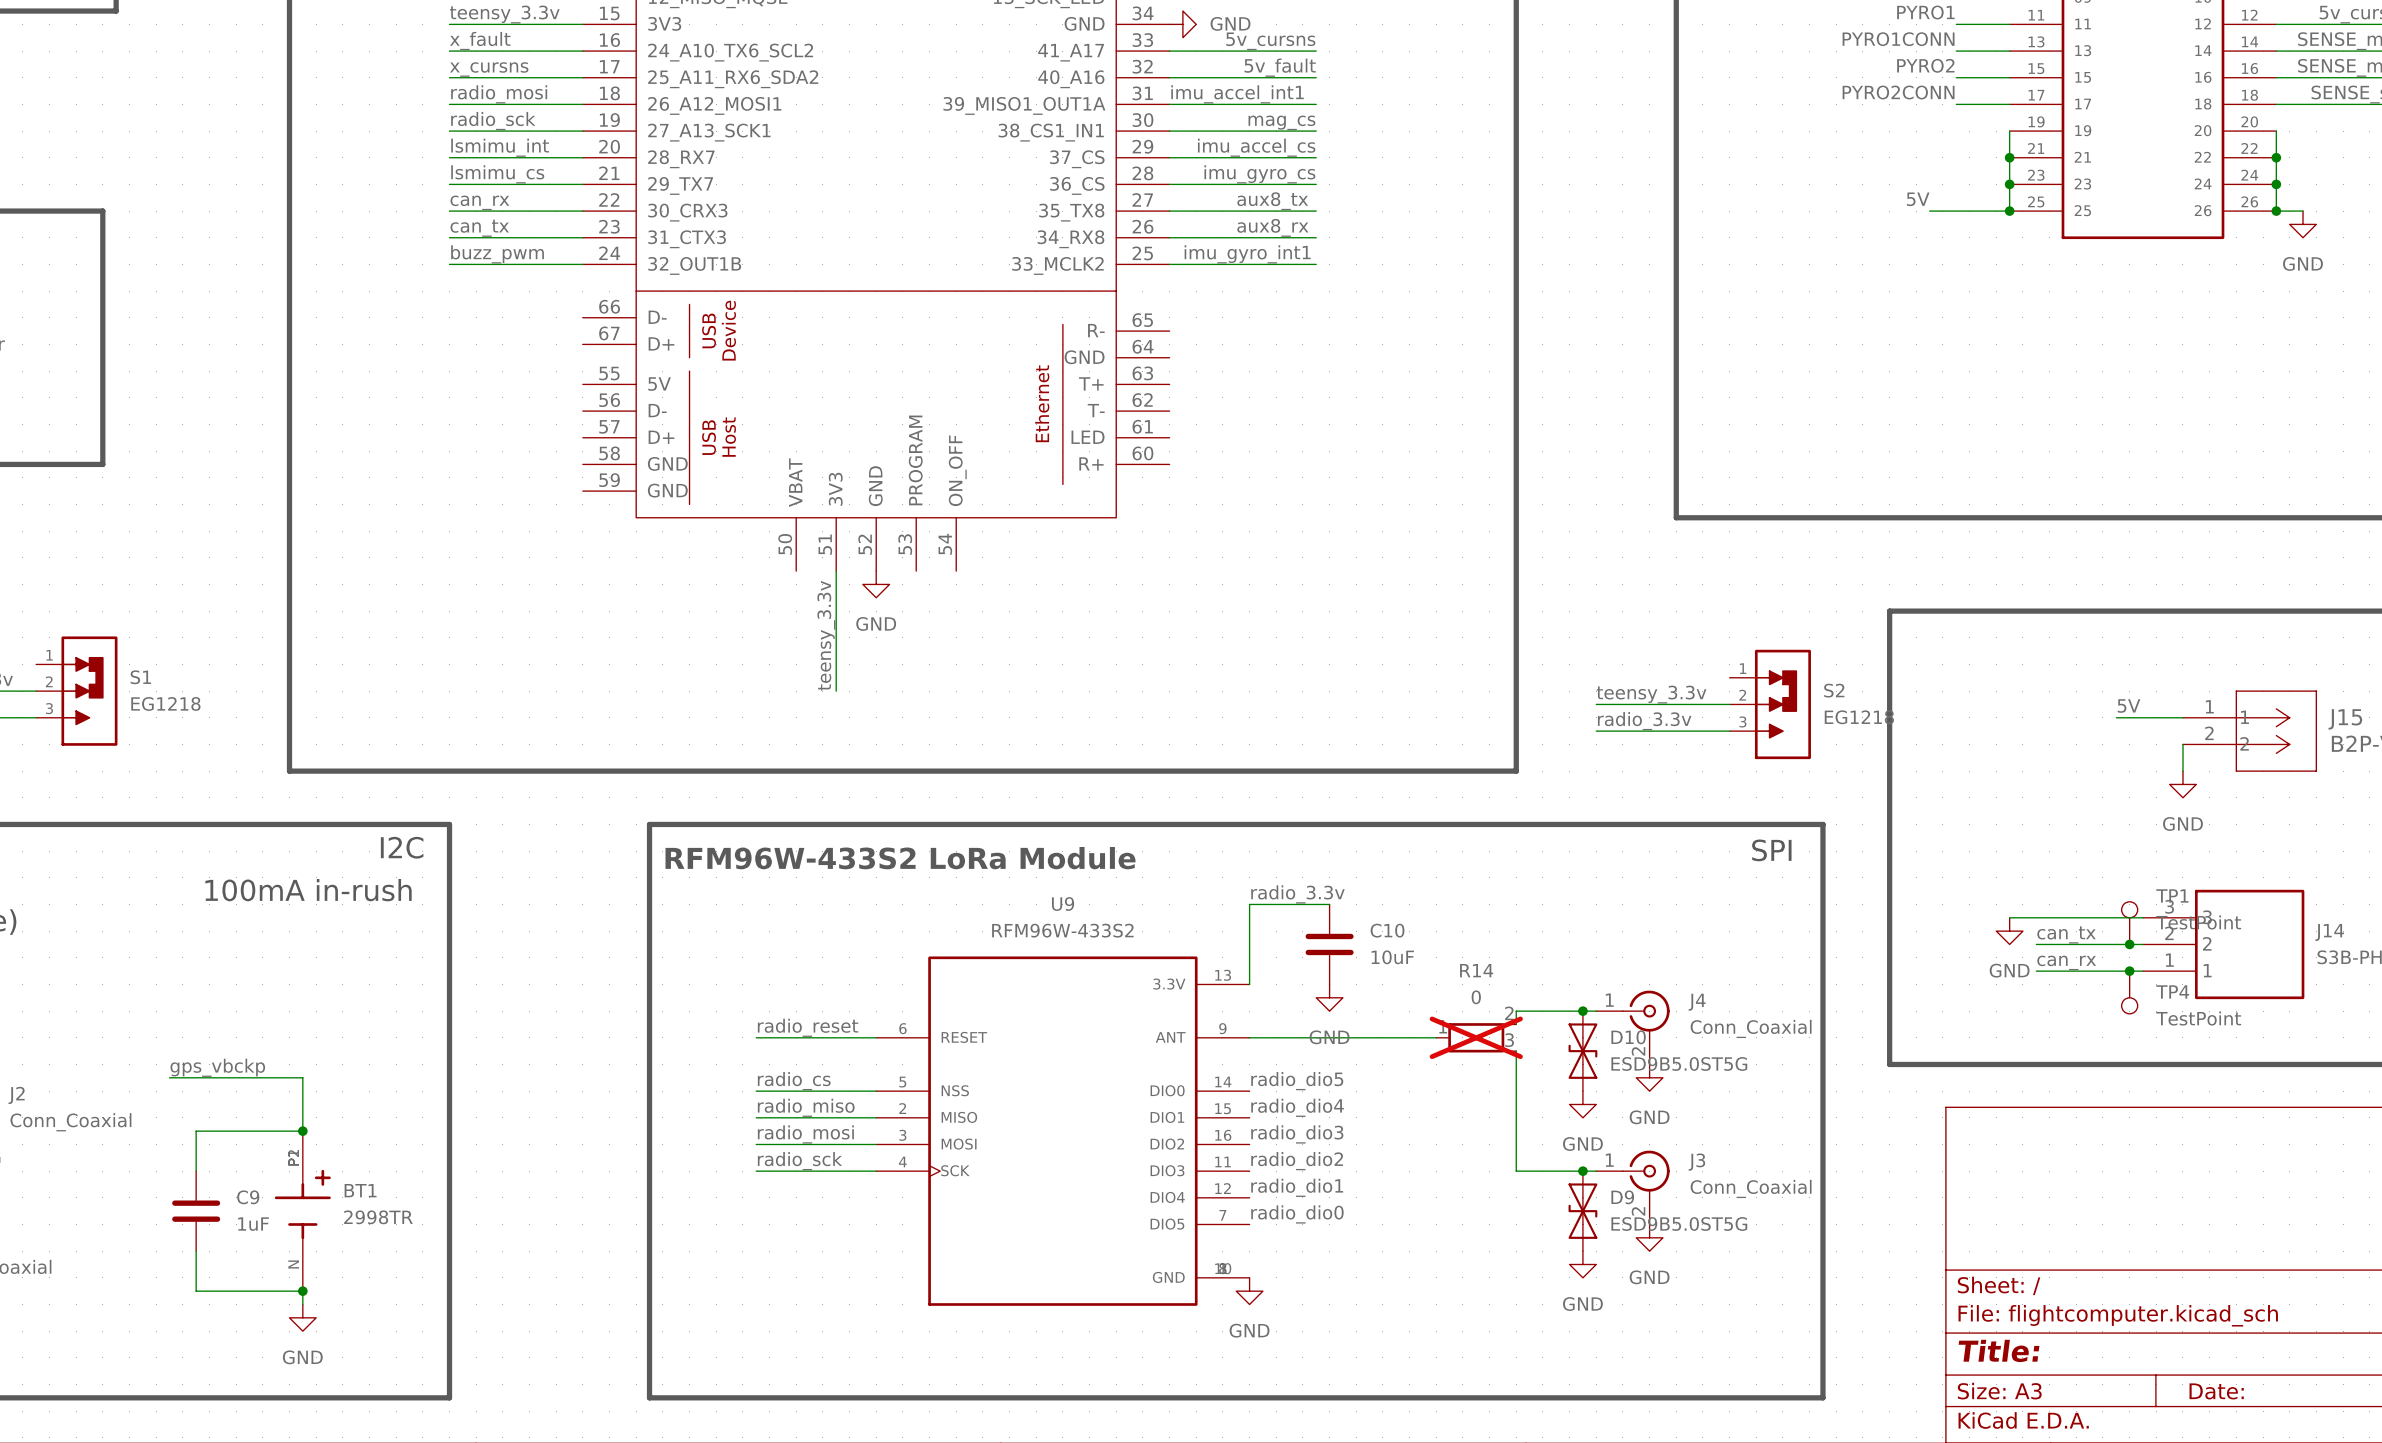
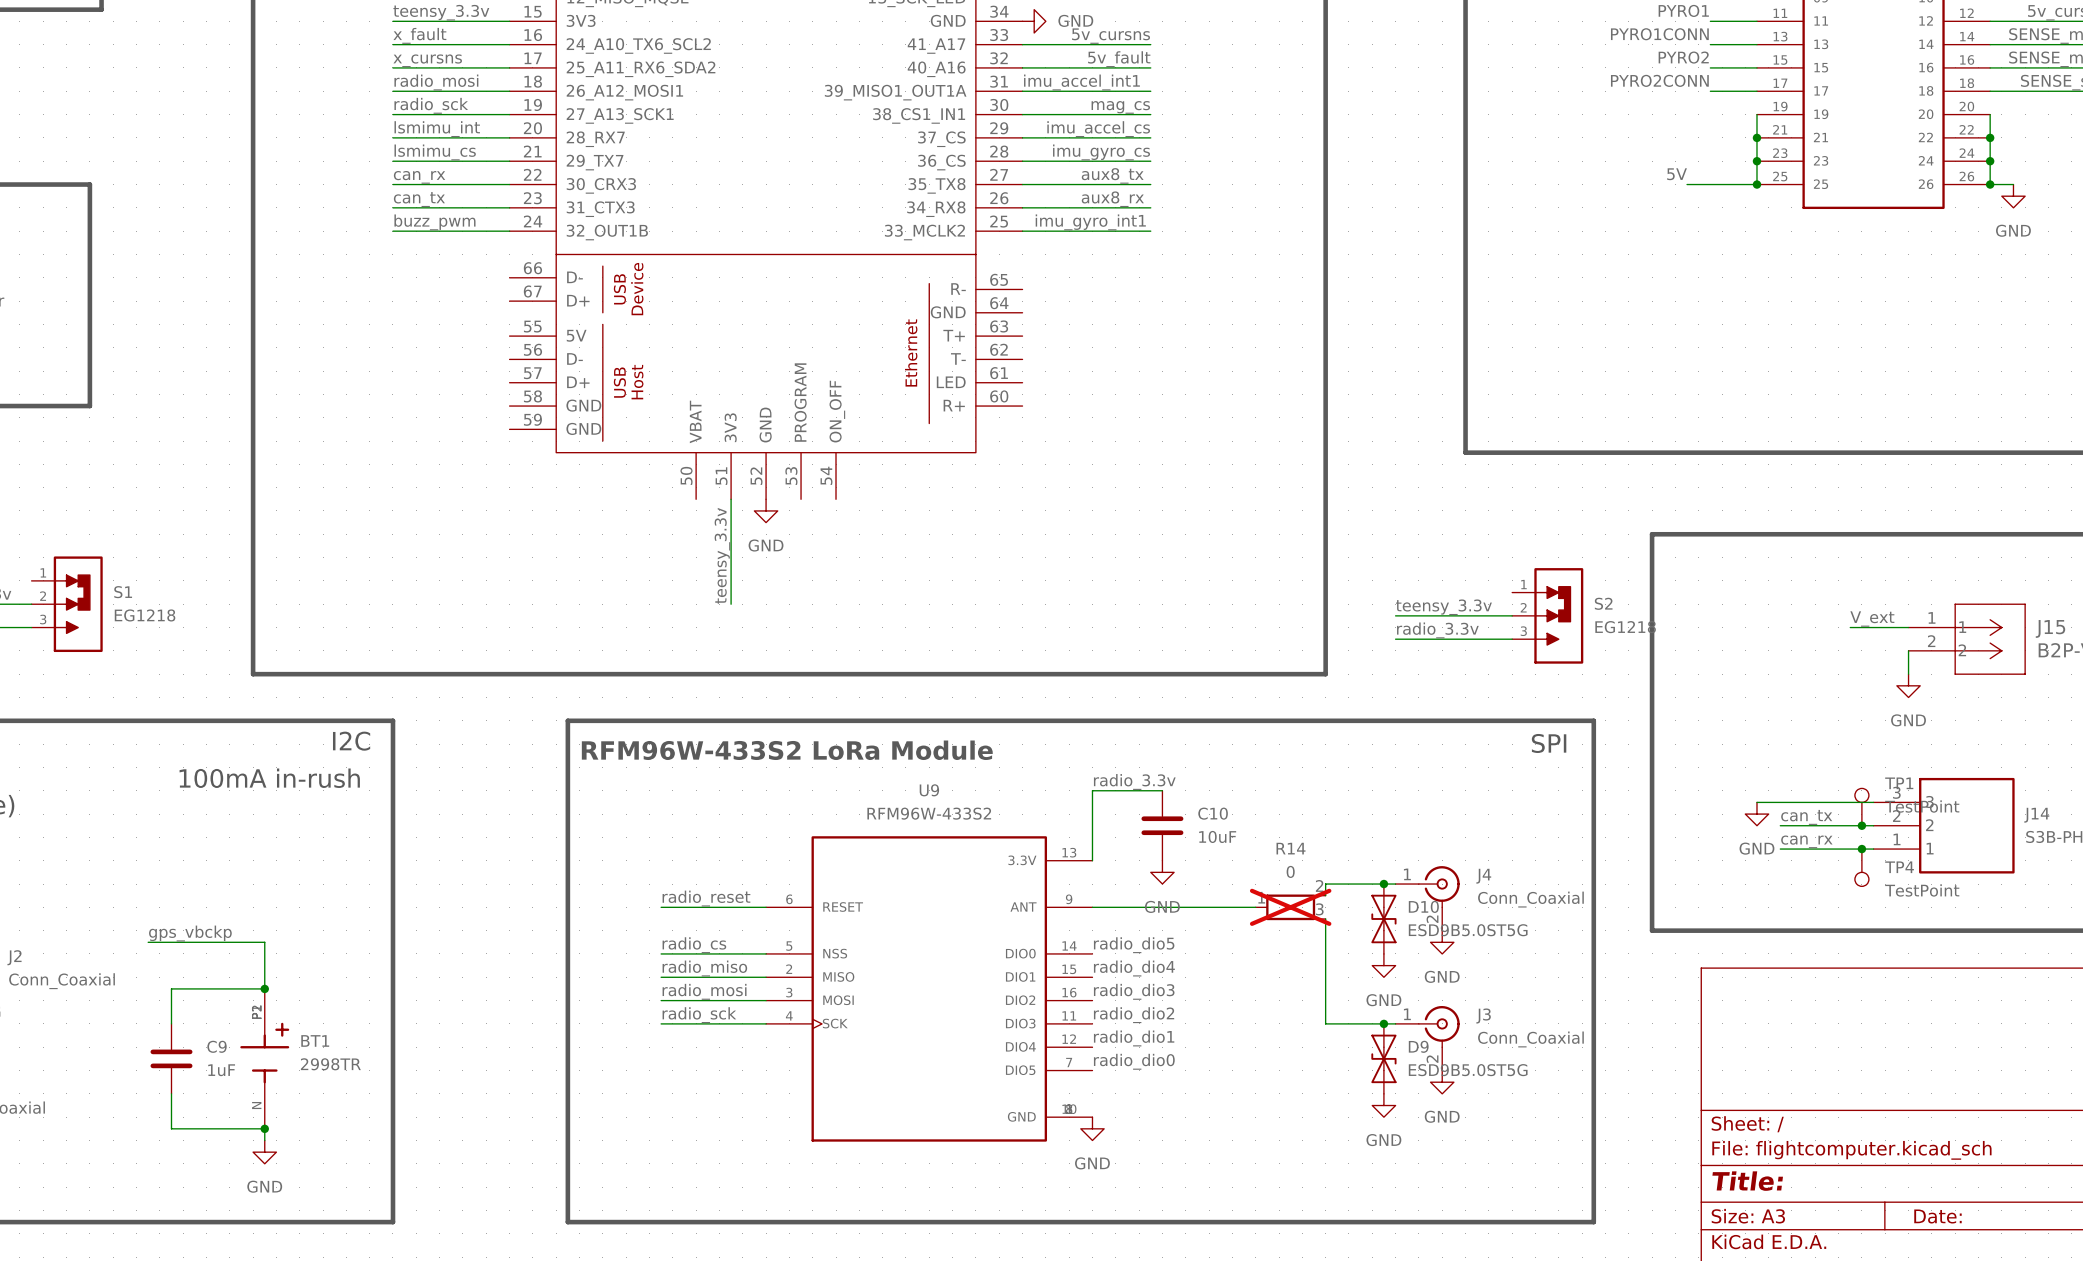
label: 5V (2129, 706) -> V_ext (1872, 619)

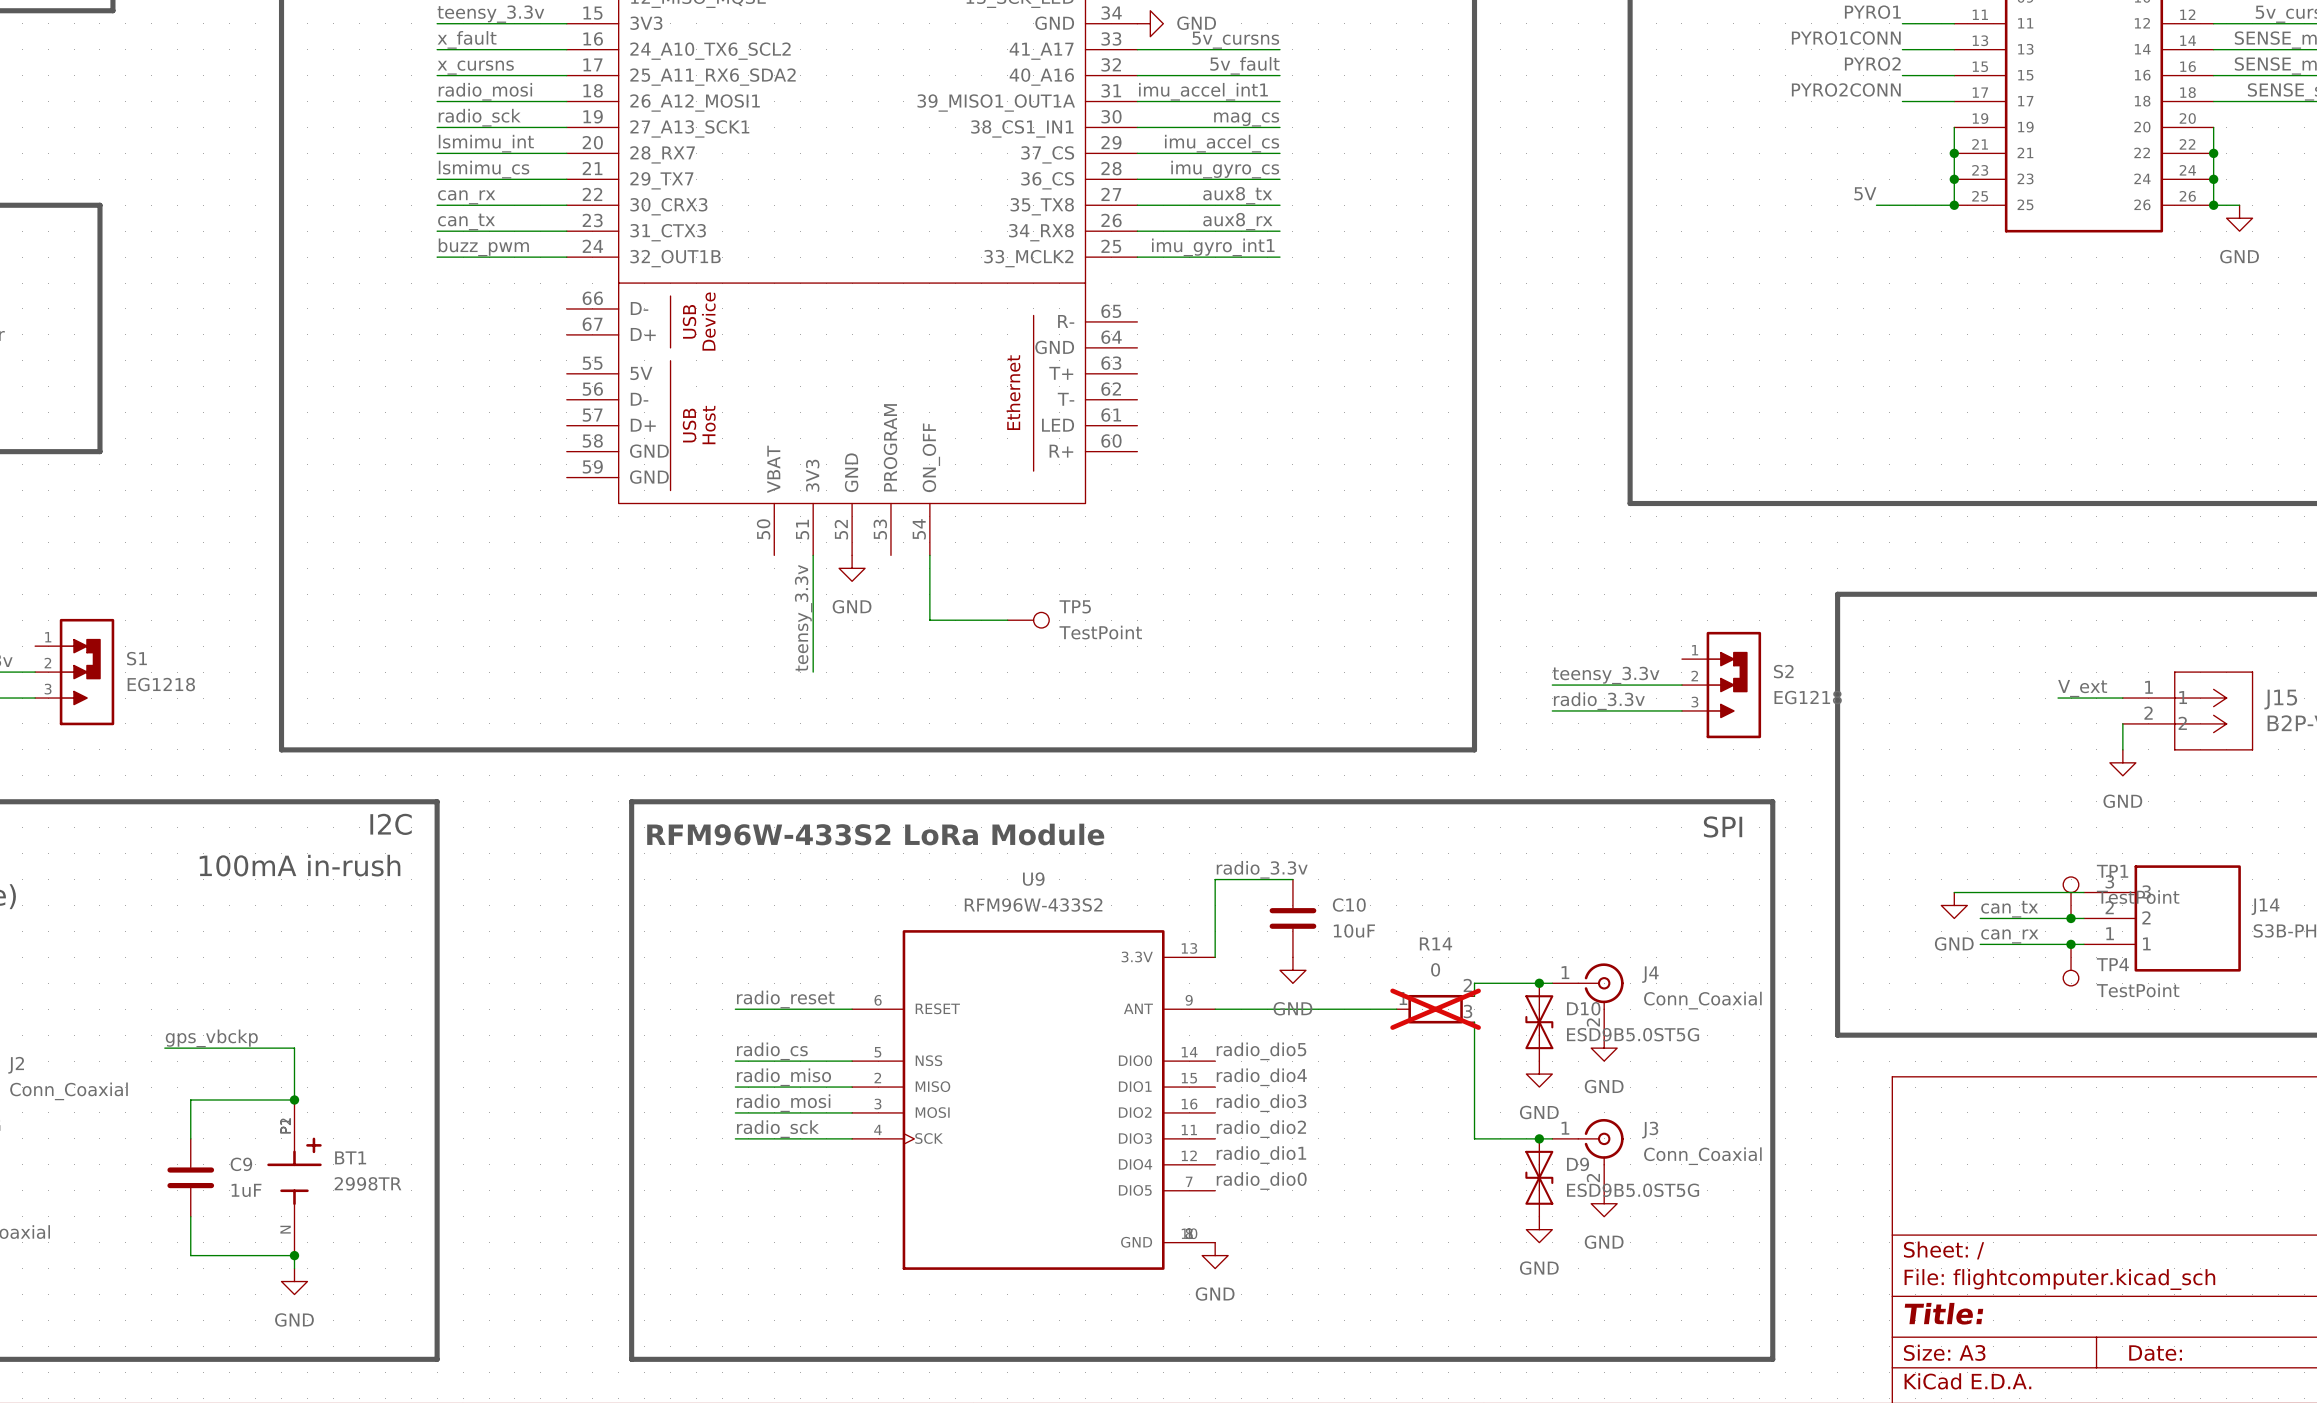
wire: none -> (929, 555) (929, 620) (1007, 620)
TP5: none -> TestPoint (1028, 620)

